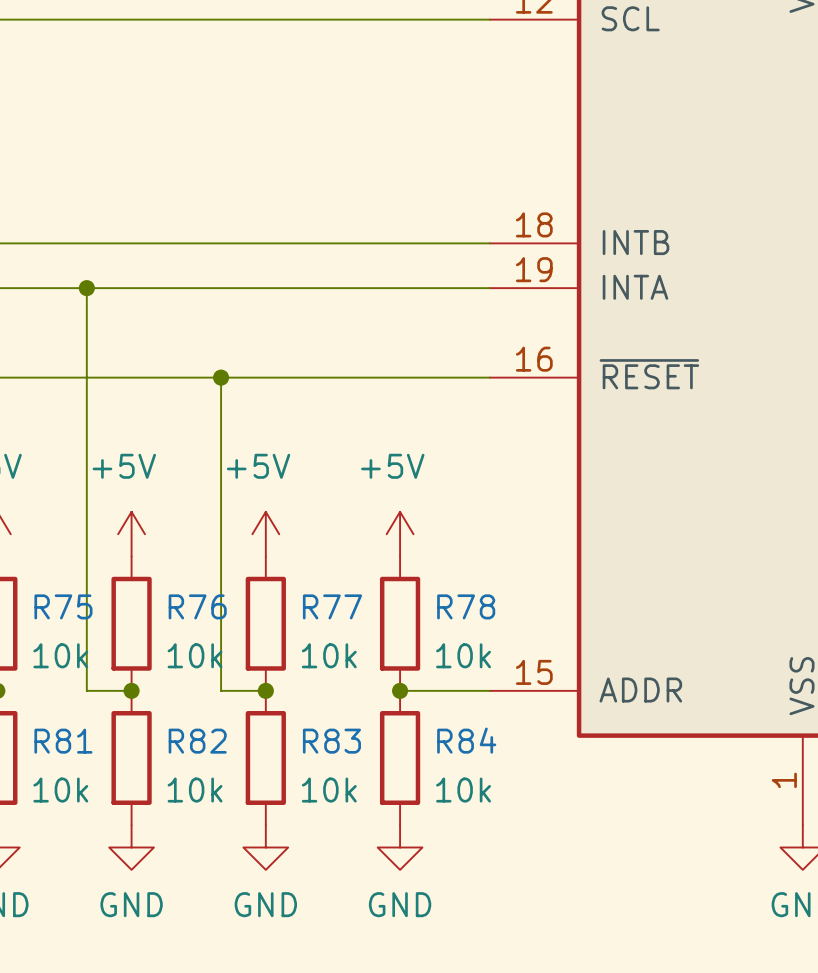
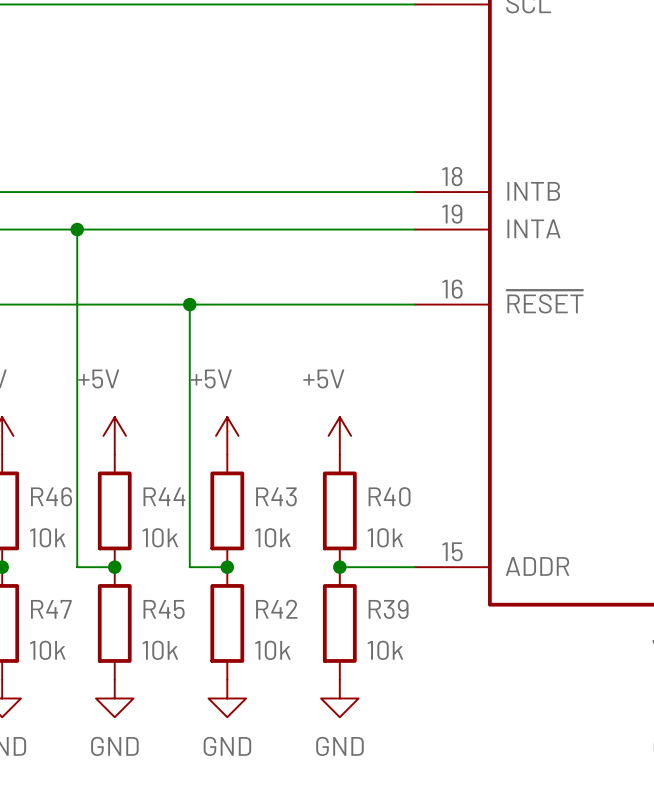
R75 name: R75 (63, 606) -> R46 (51, 496)
R76 name: R76 (197, 606) -> R44 (164, 496)
R77 name: R77 (332, 606) -> R43 (276, 496)
R78 name: R78 (466, 606) -> R40 (389, 496)
R84 name: R84 (466, 740) -> R39 (388, 609)
R81 name: R81 (63, 741) -> R47 (51, 609)
R82 name: R82 (197, 741) -> R45 (164, 609)
R83 name: R83 (331, 741) -> R42 (276, 609)

